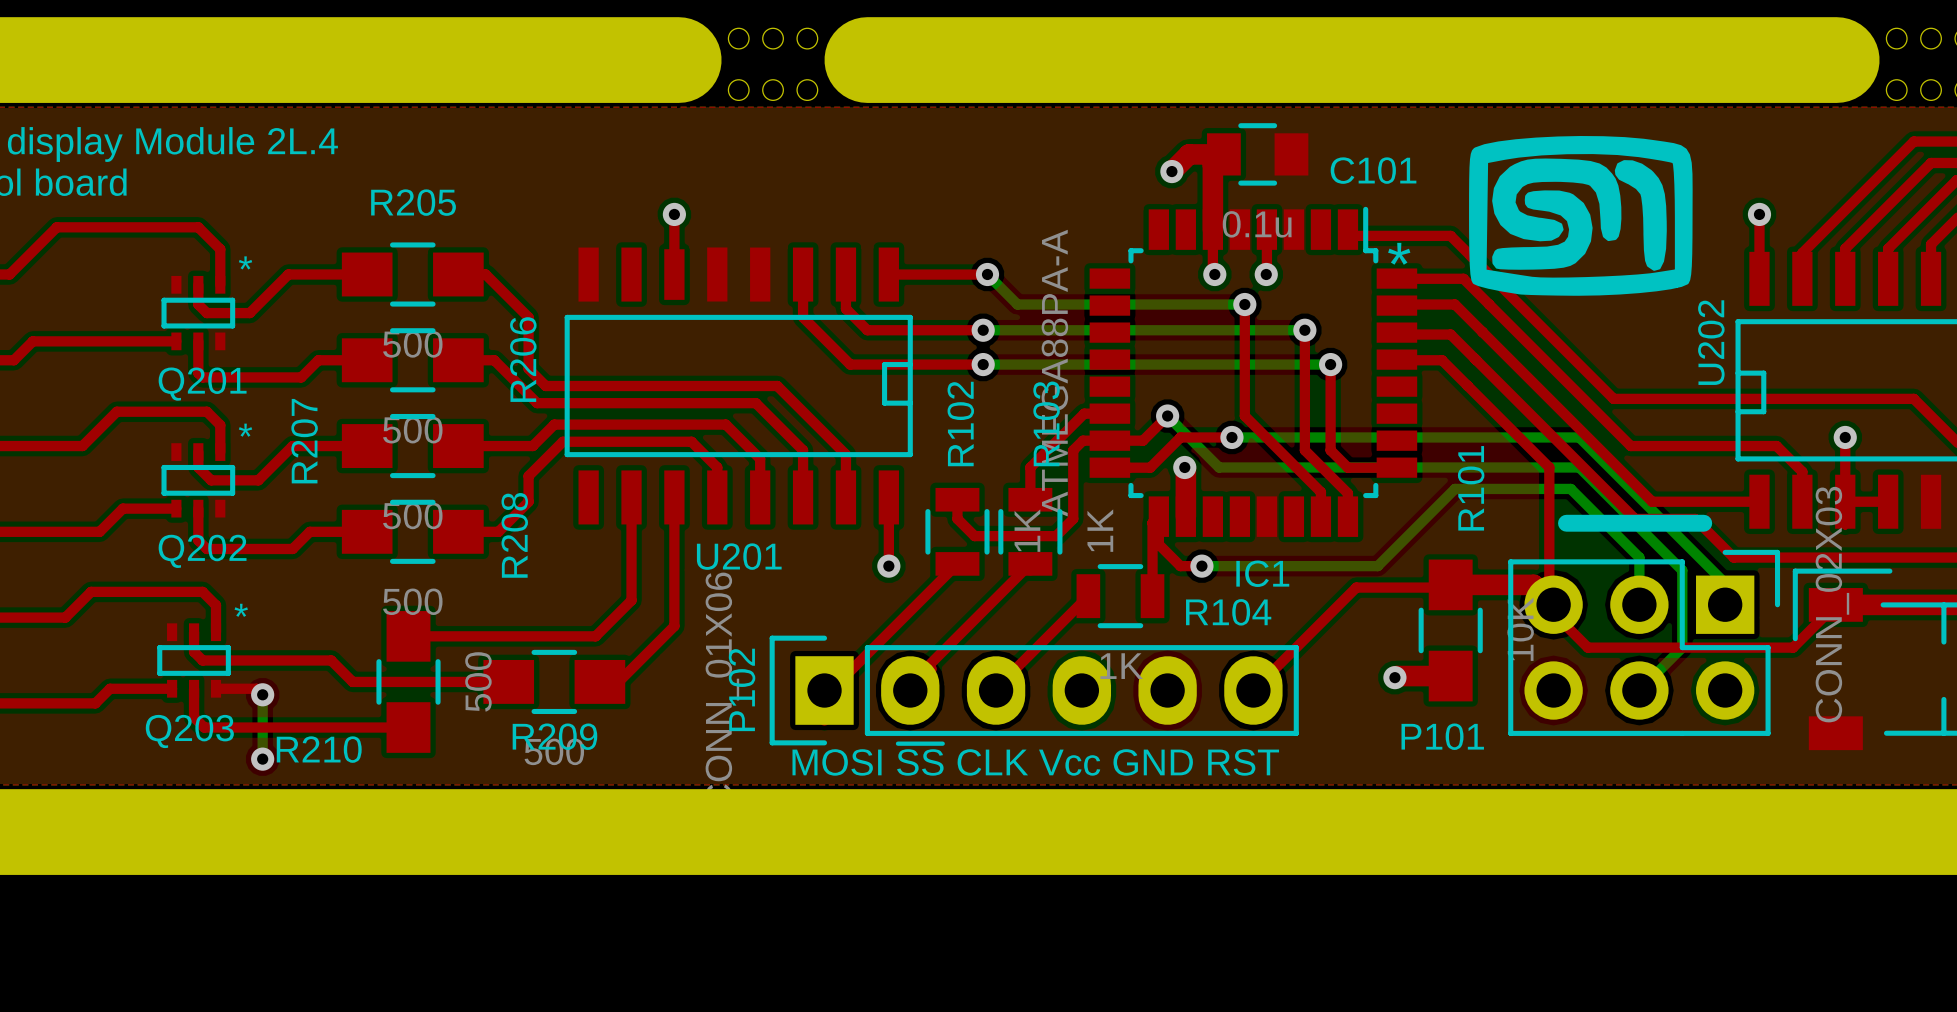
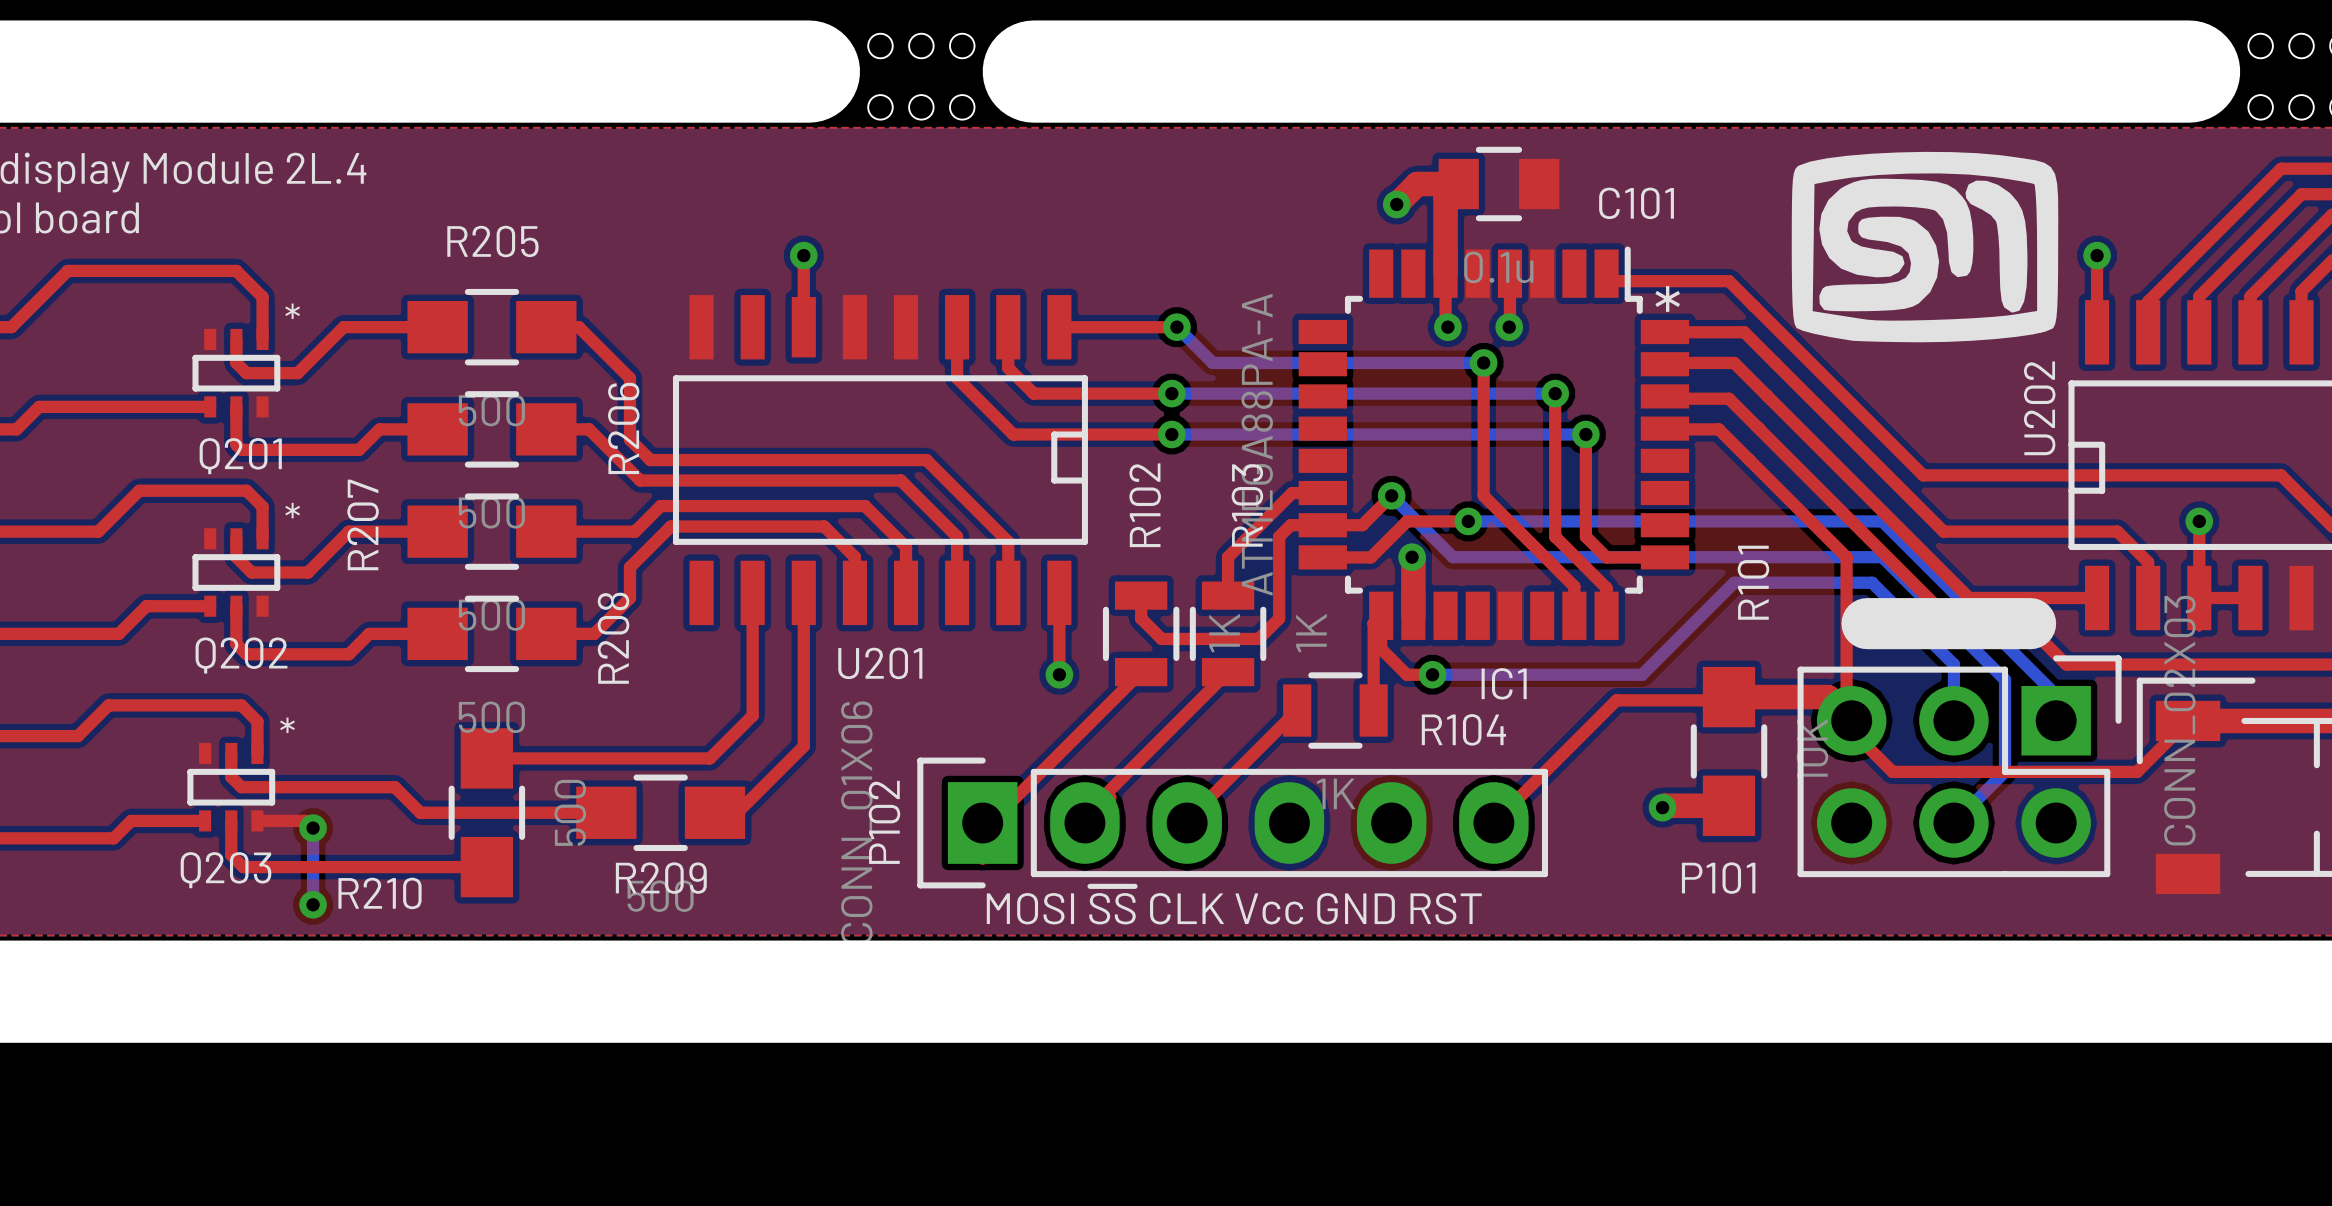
drawing position: (1580, 215) -> (1925, 247)
line width: thin (1566, 523) (1703, 523) -> thick (1867, 623) (2030, 623)

